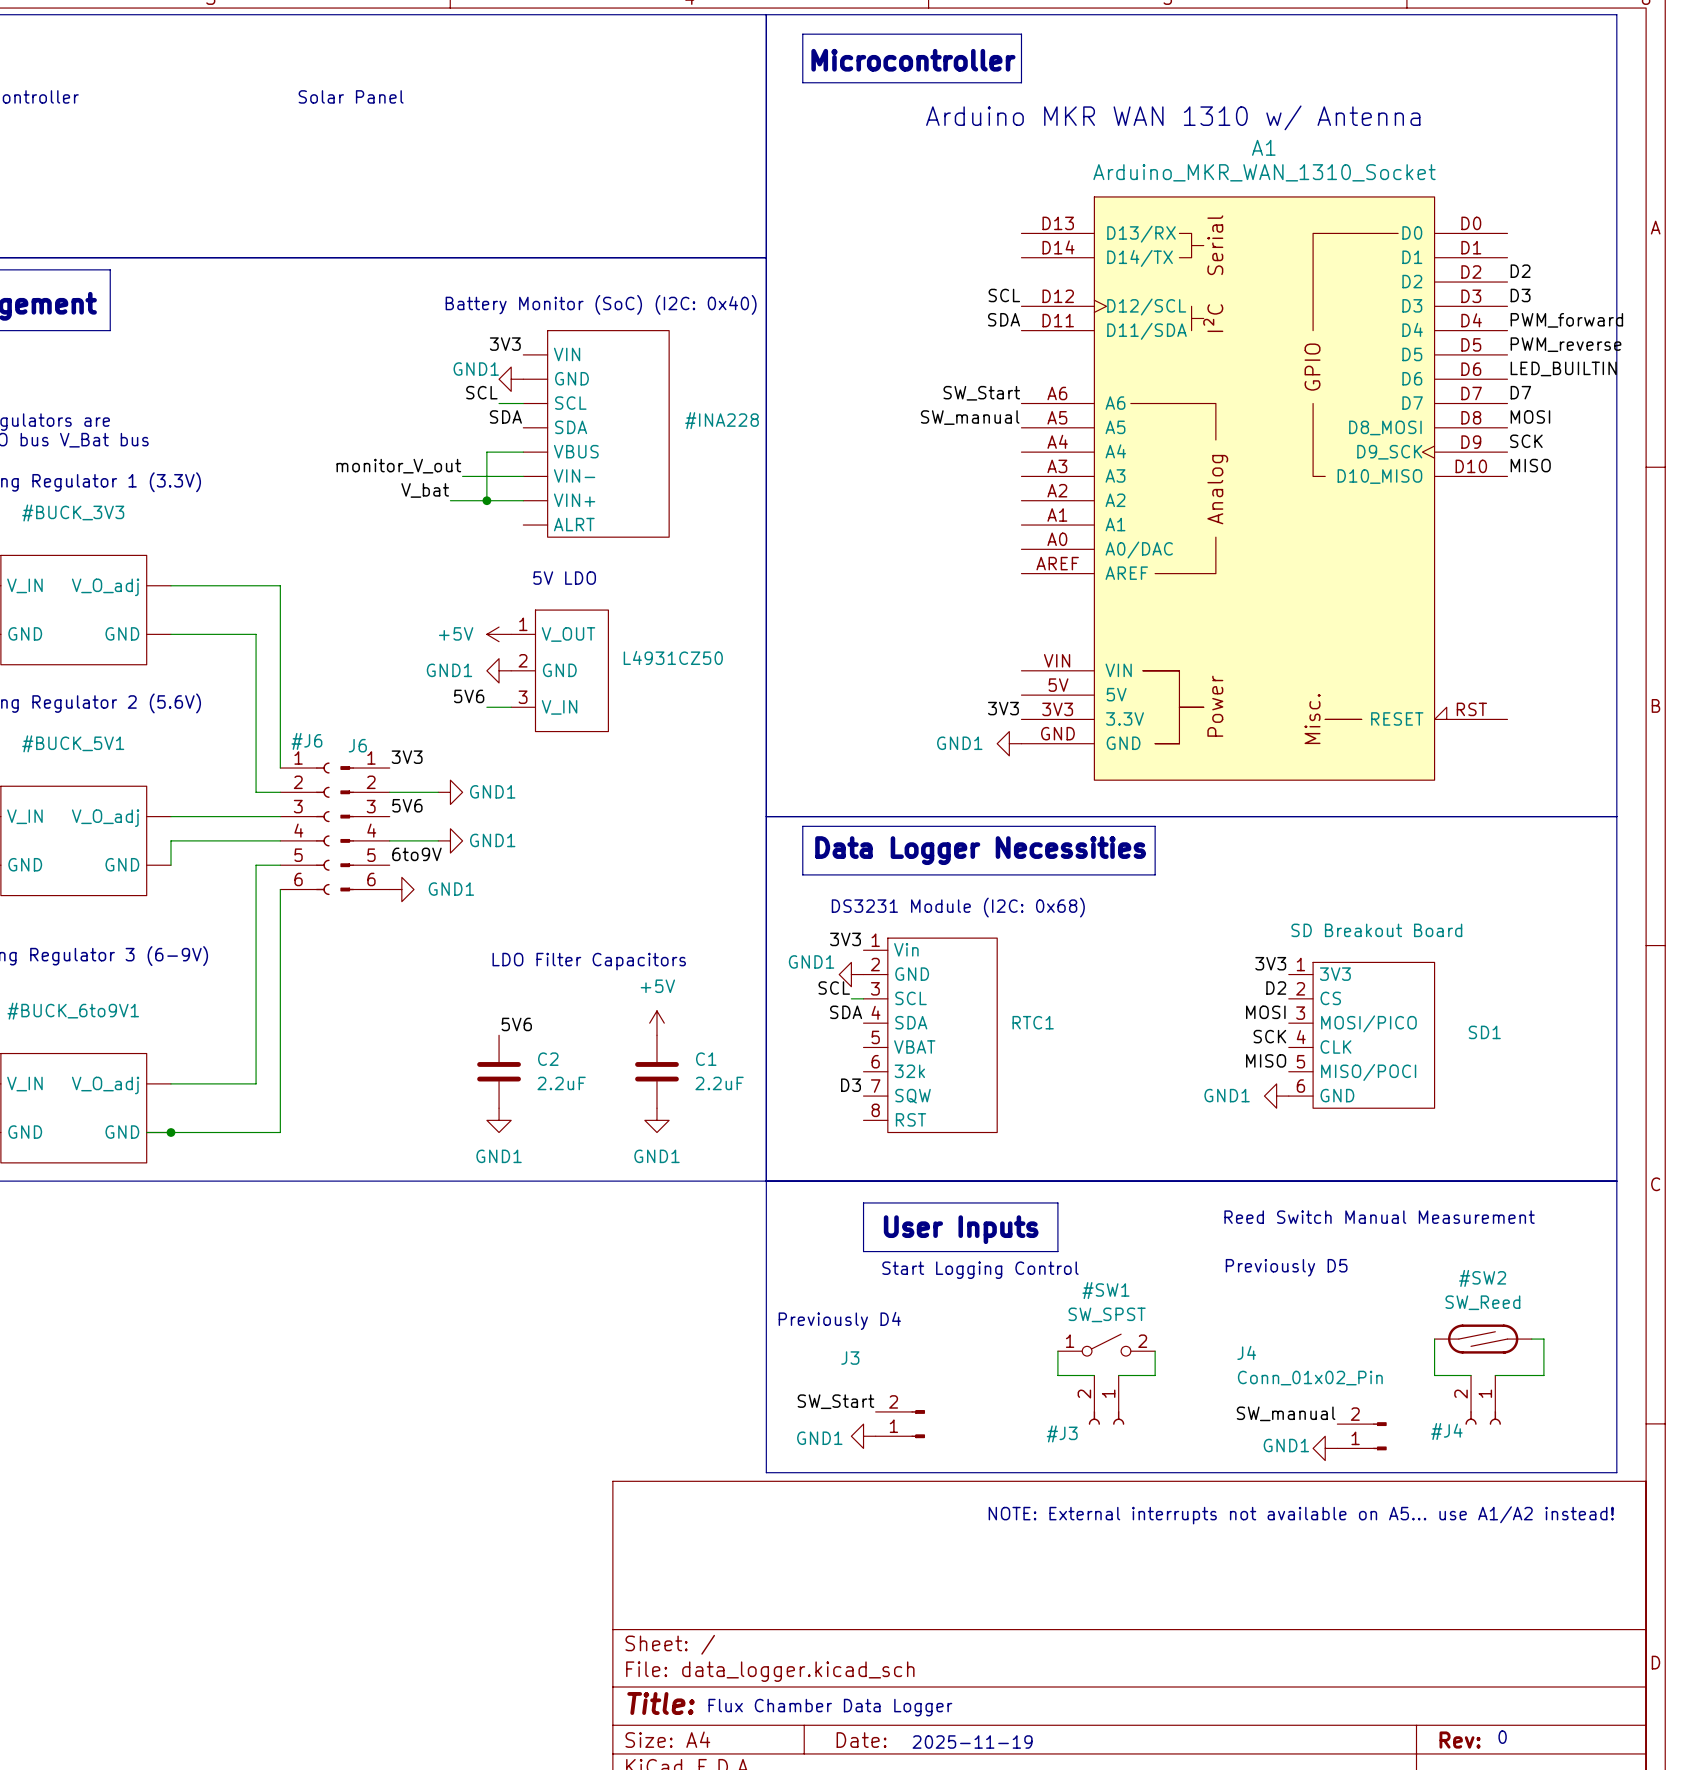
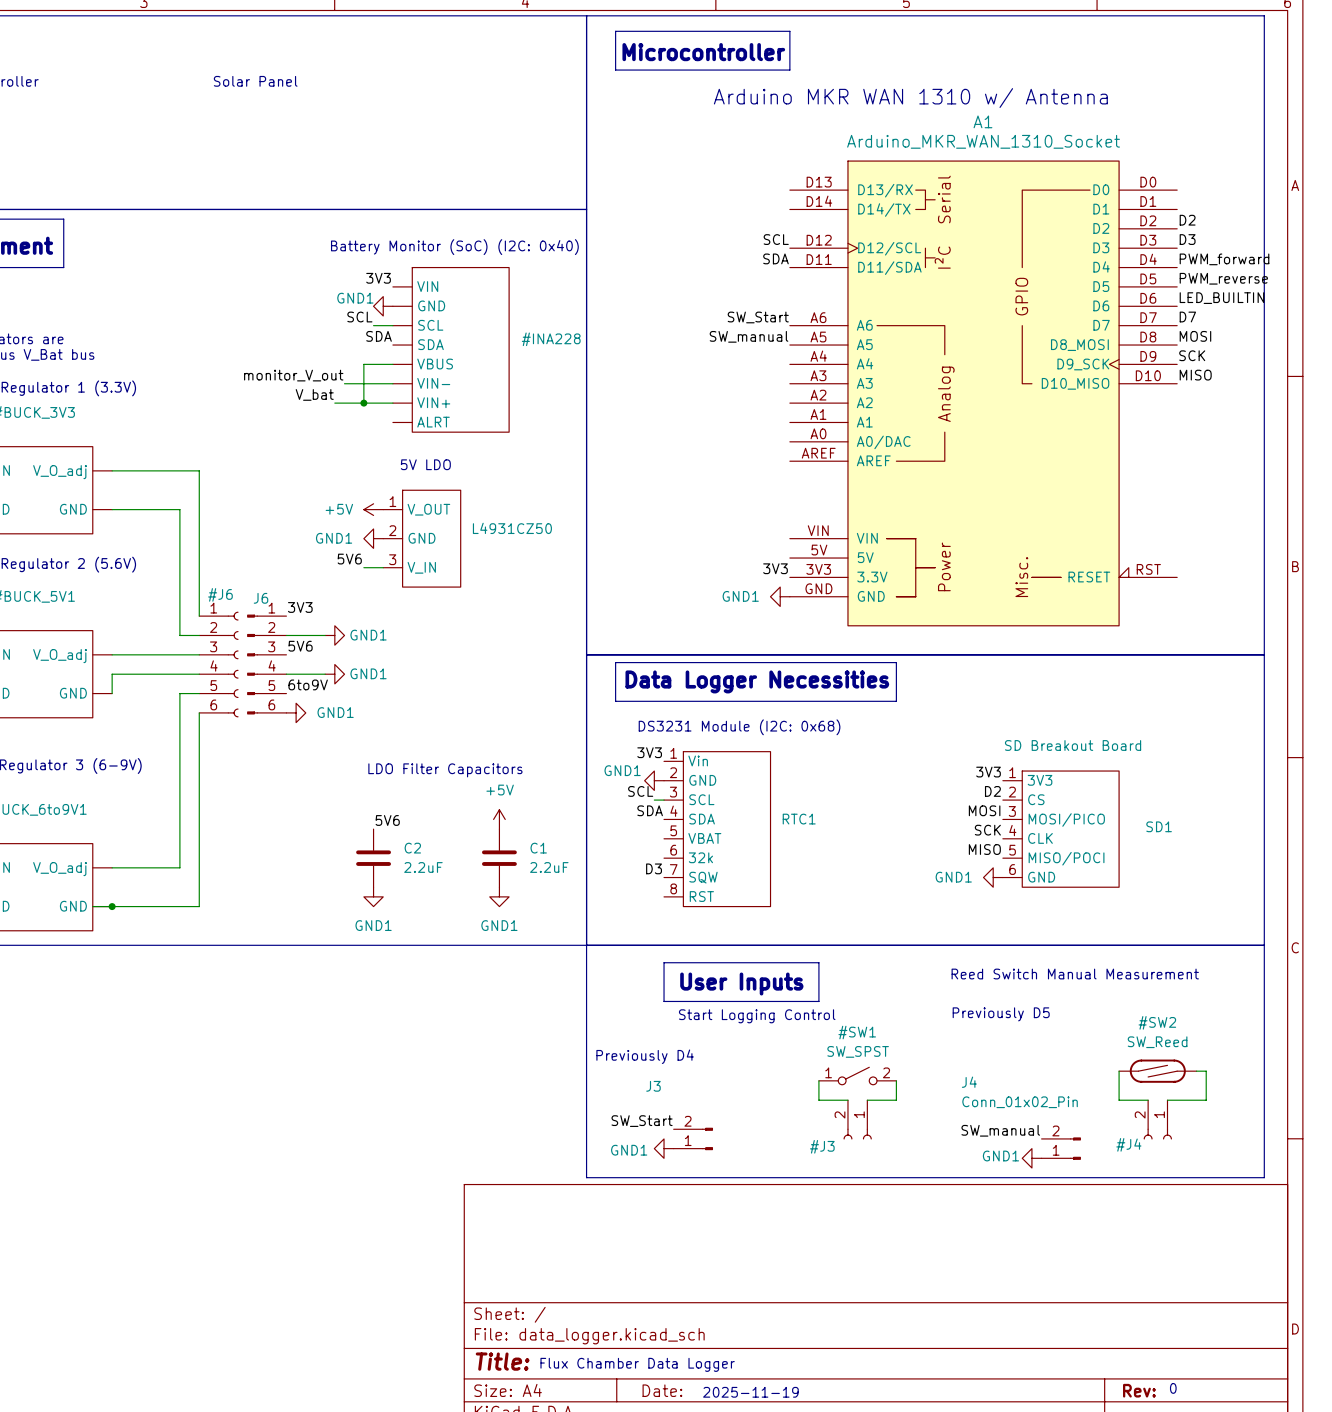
text: NOTE: External interrupts not available on A5... use A1/A2 instead! (1301, 1515) -> none

